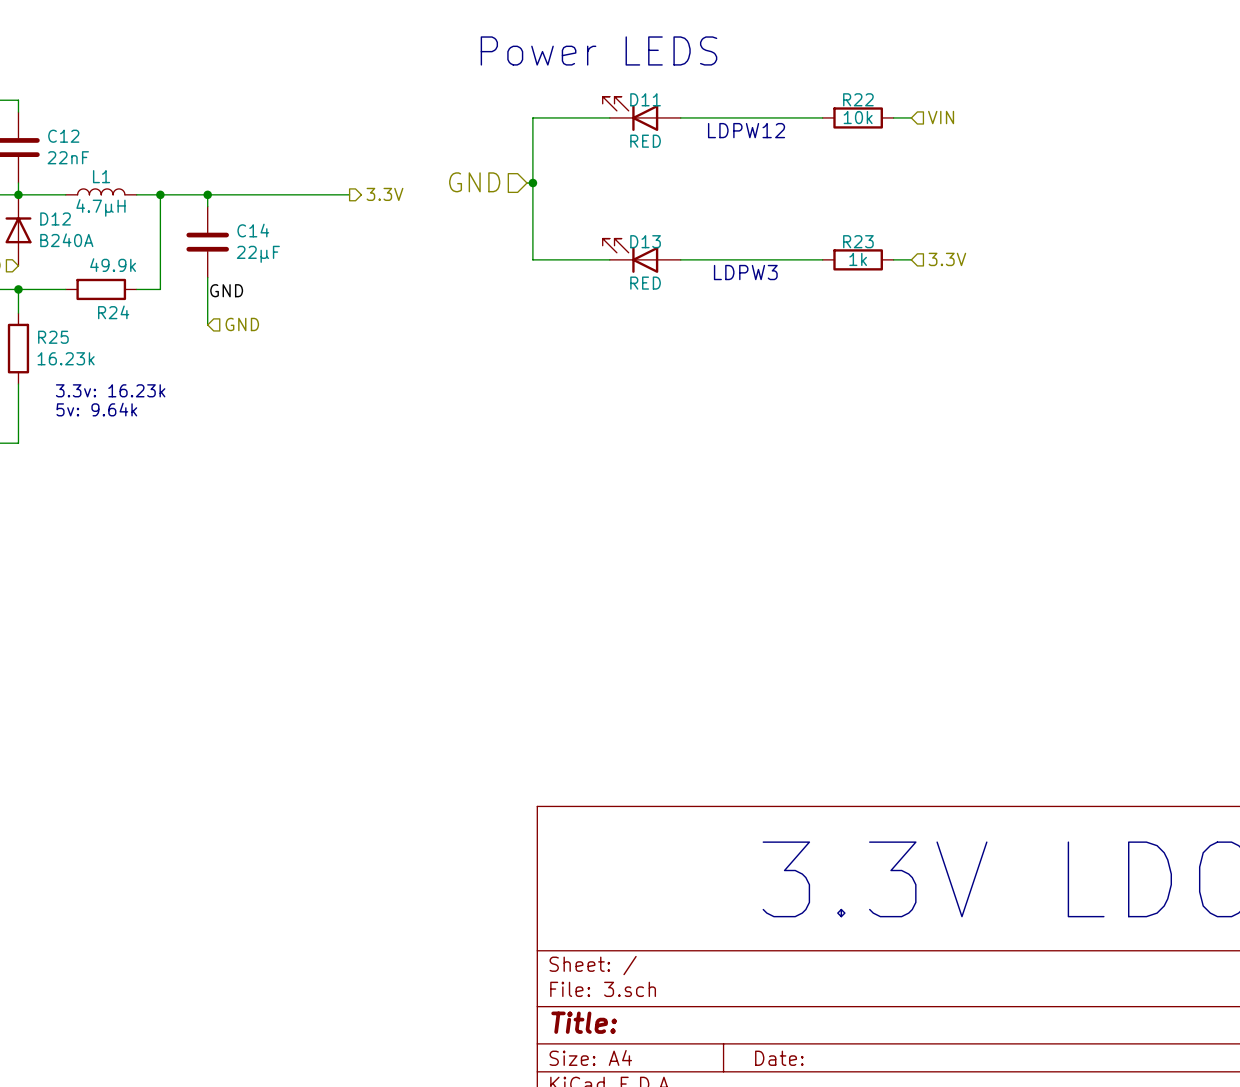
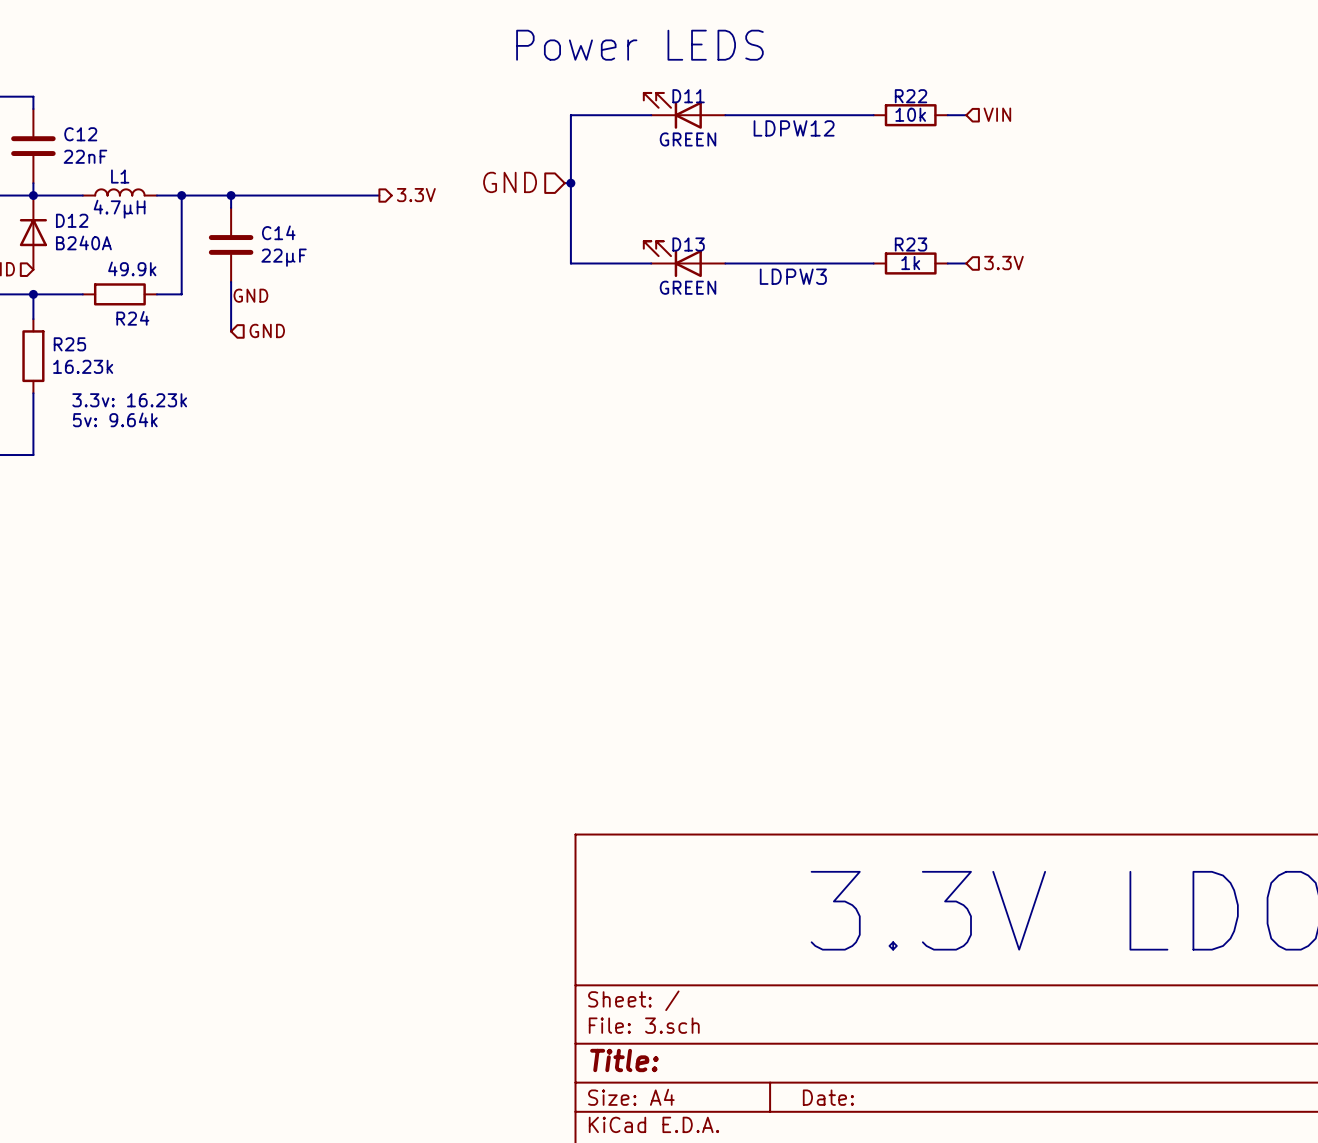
D11 value: RED (645, 141) -> GREEN (688, 139)
D13 value: RED (645, 283) -> GREEN (688, 287)

